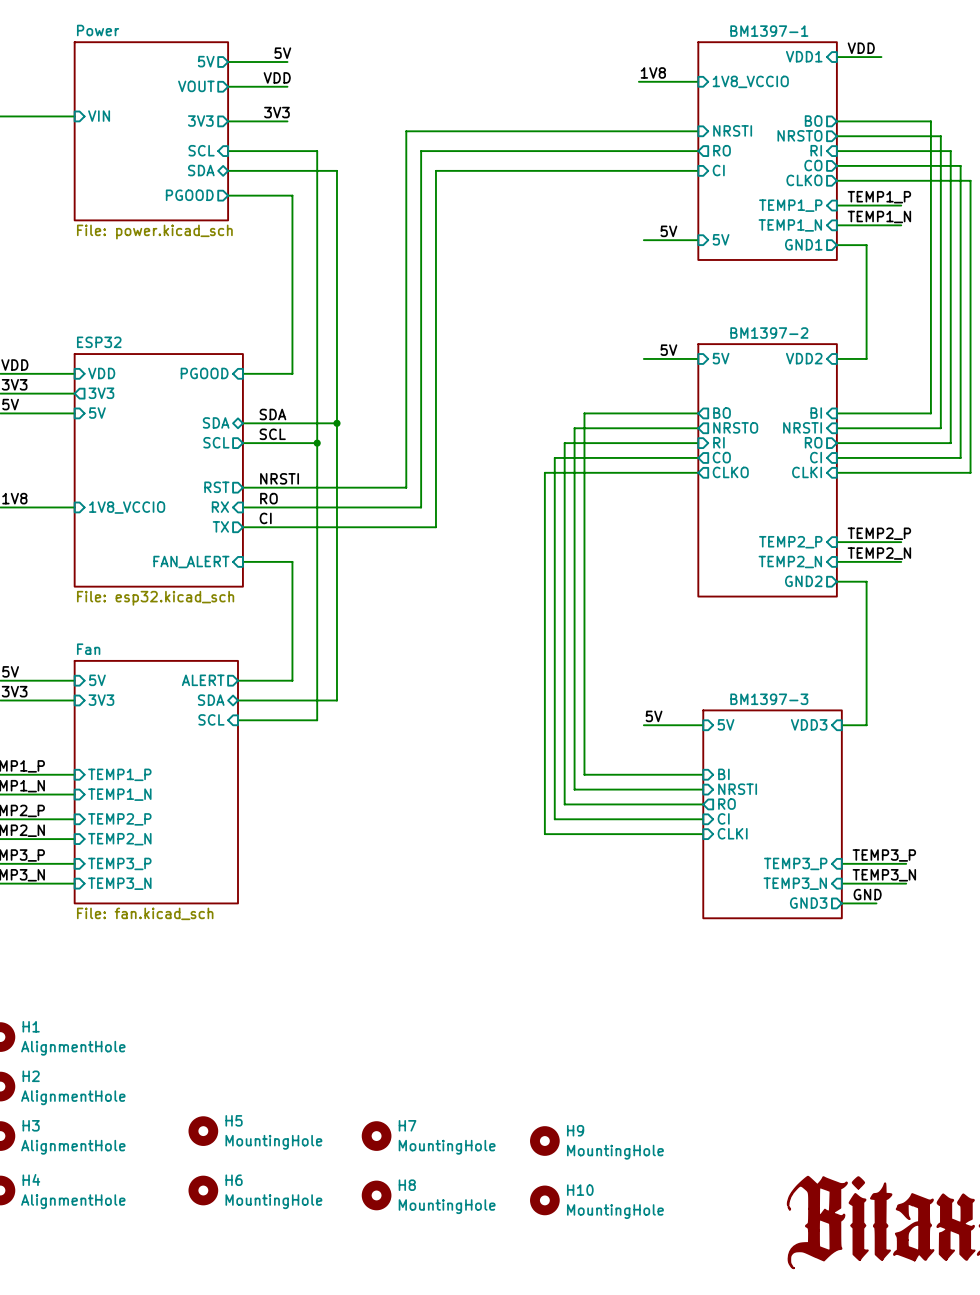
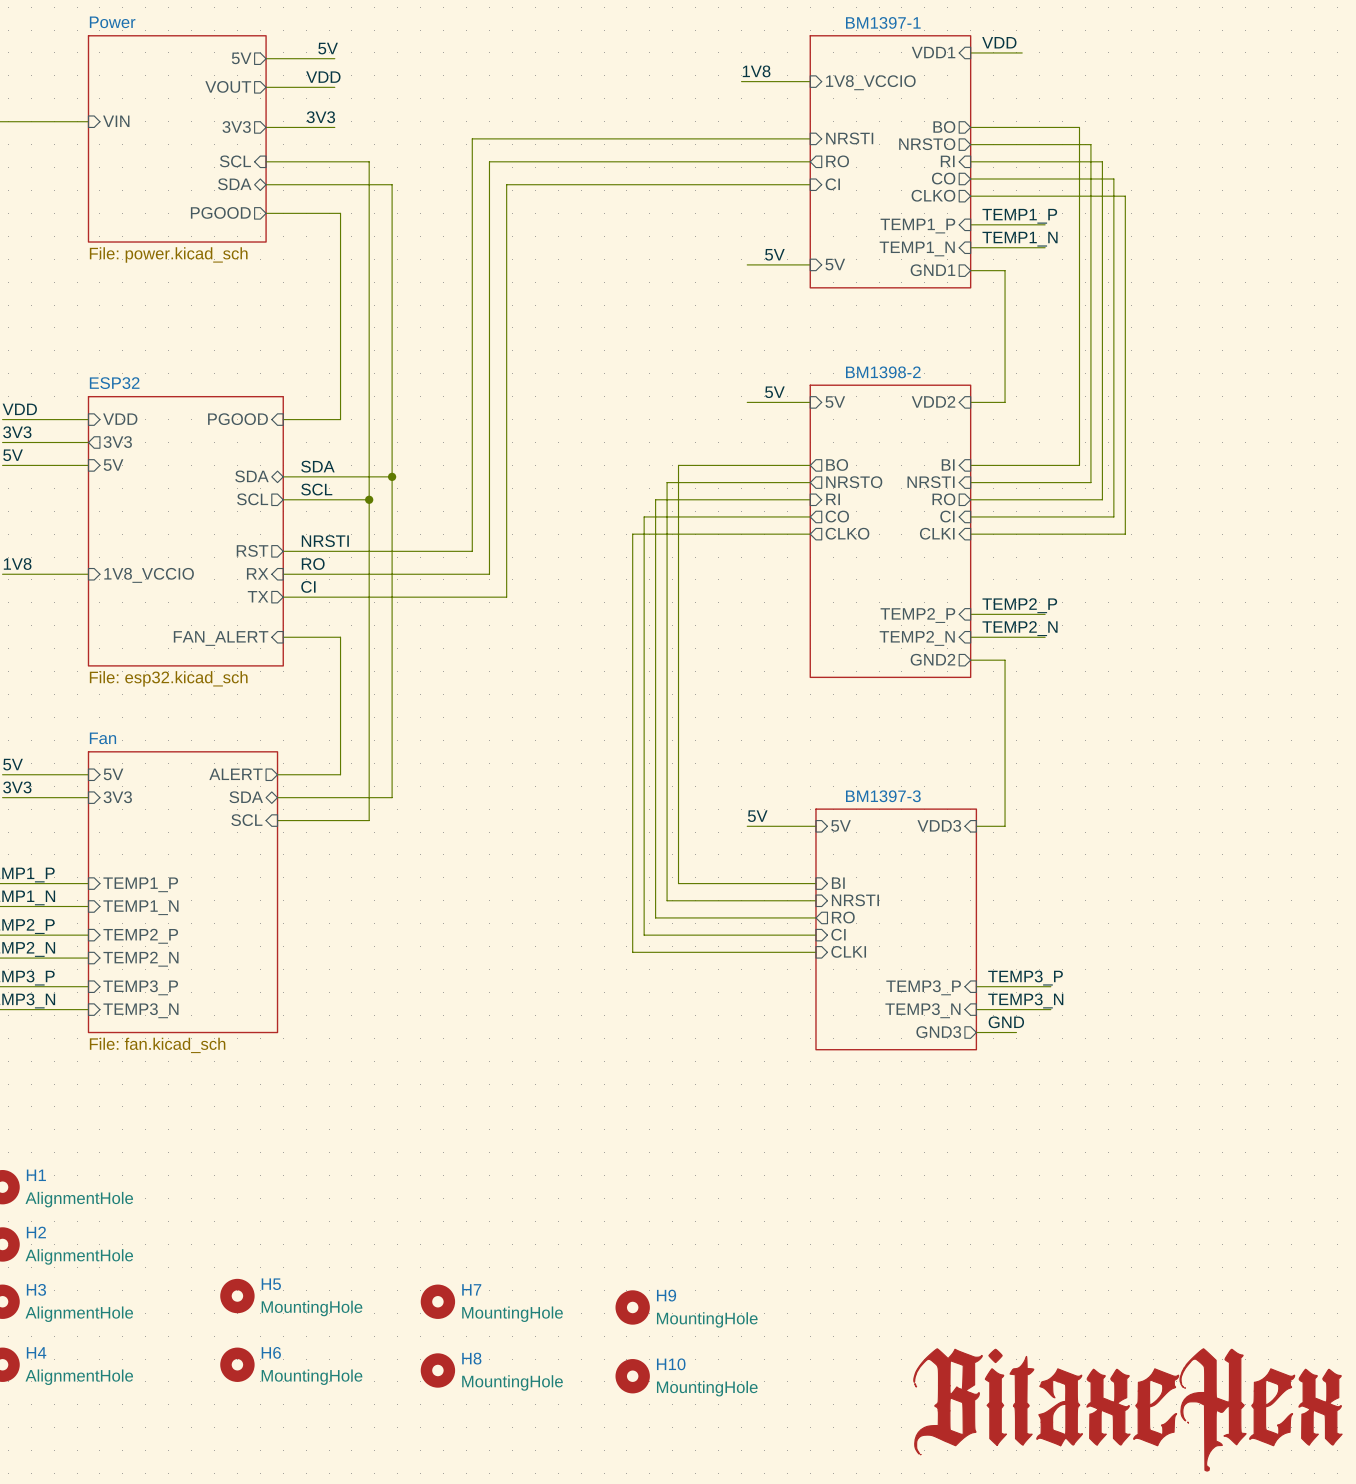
sheet BM1397-2 name: BM1397-2 (769, 333) -> BM1398-2 (883, 372)

